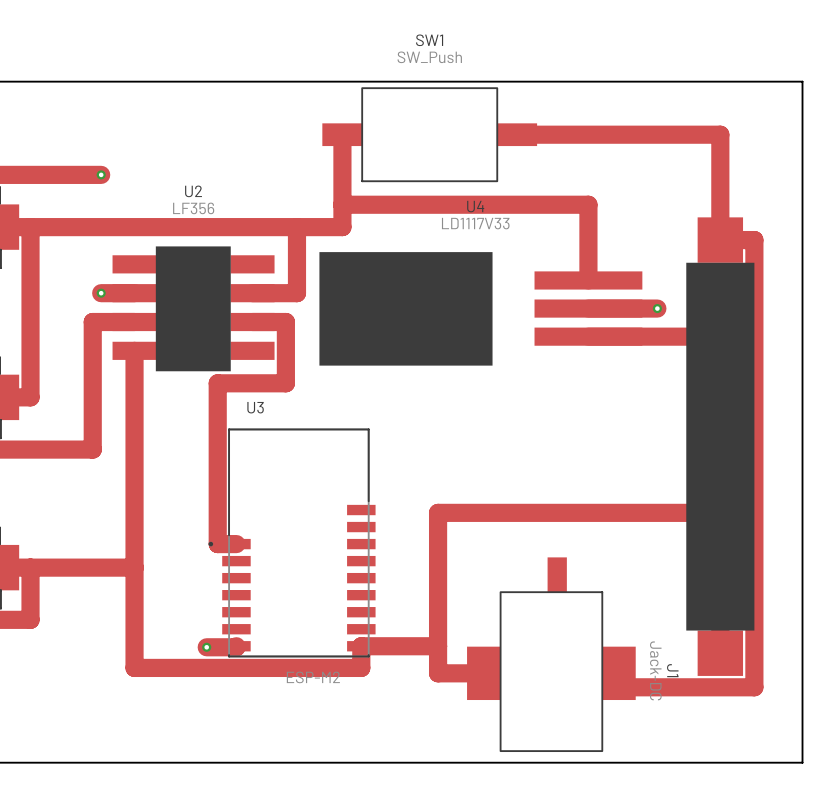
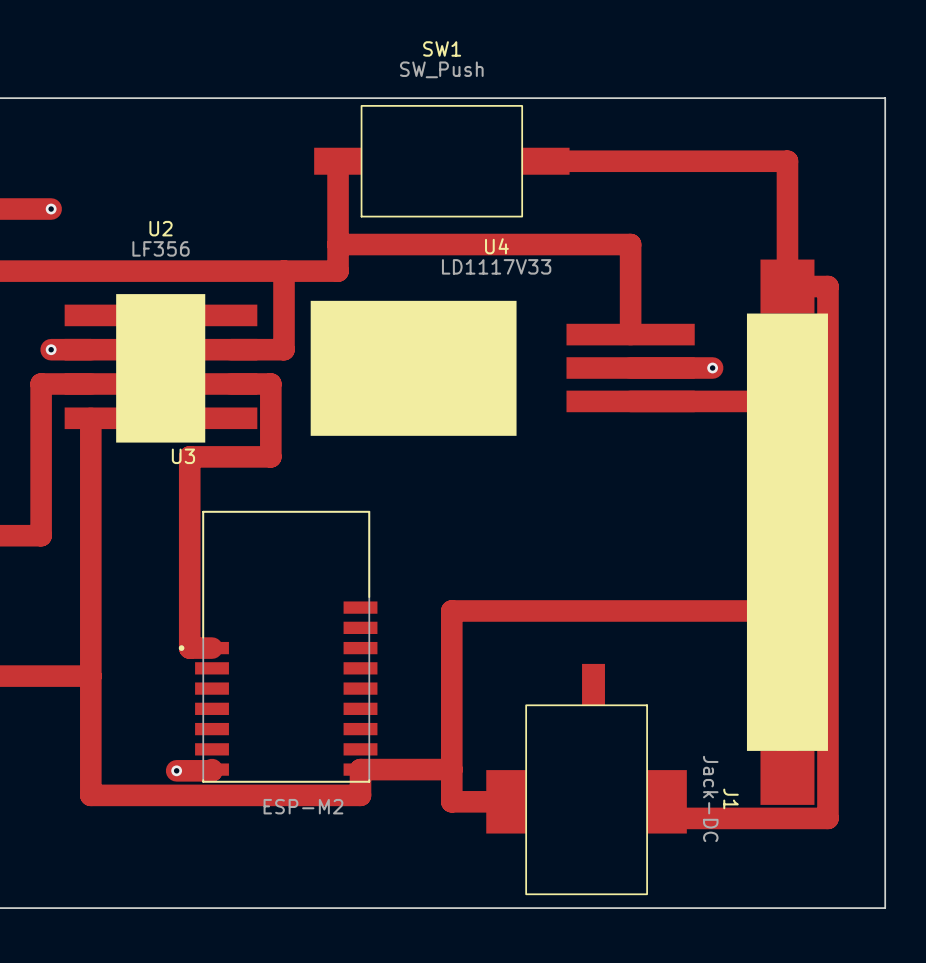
U3 name position: U3 (255, 407) -> U3 (183, 456)

